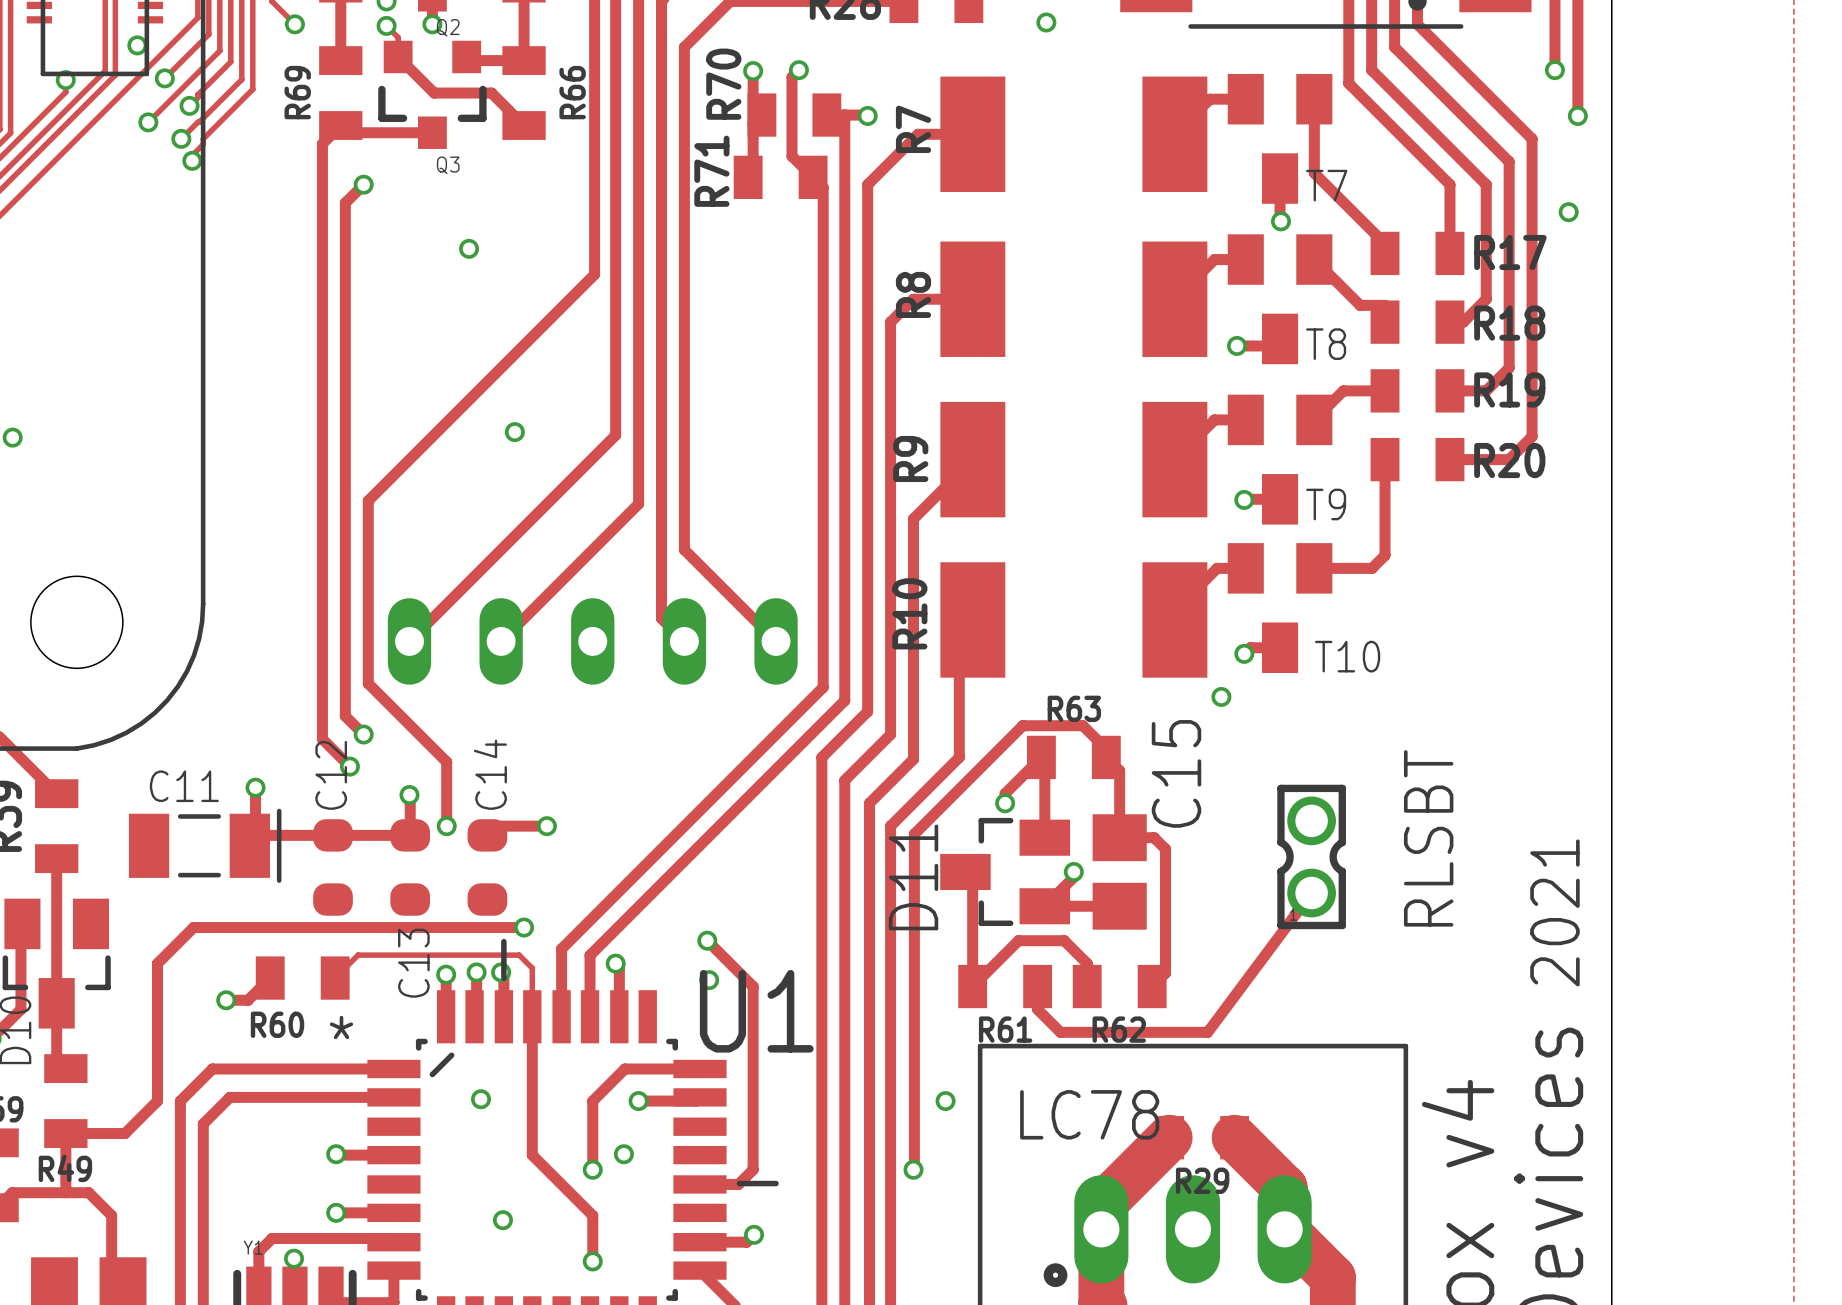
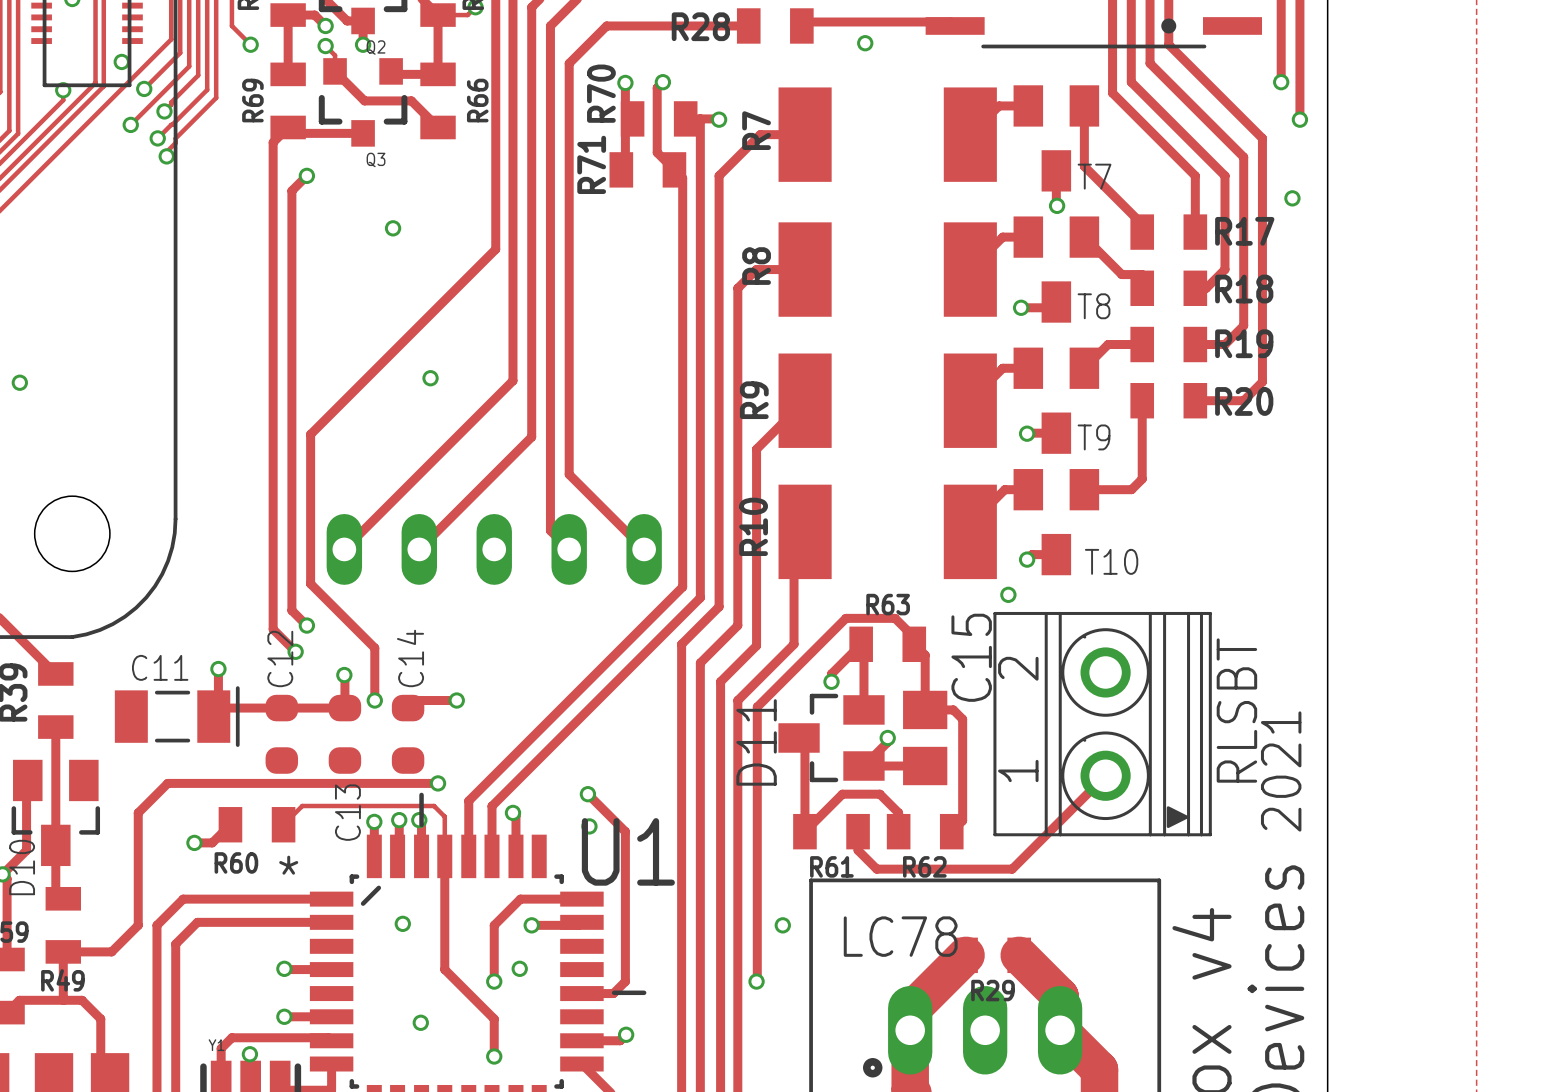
RLSBT footprint: [1277, 784, 1346, 930] -> [993, 611, 1212, 837]
track: (1311, 893) (1207, 1032) -> (1105, 775) (1012, 869) (997, 869)

